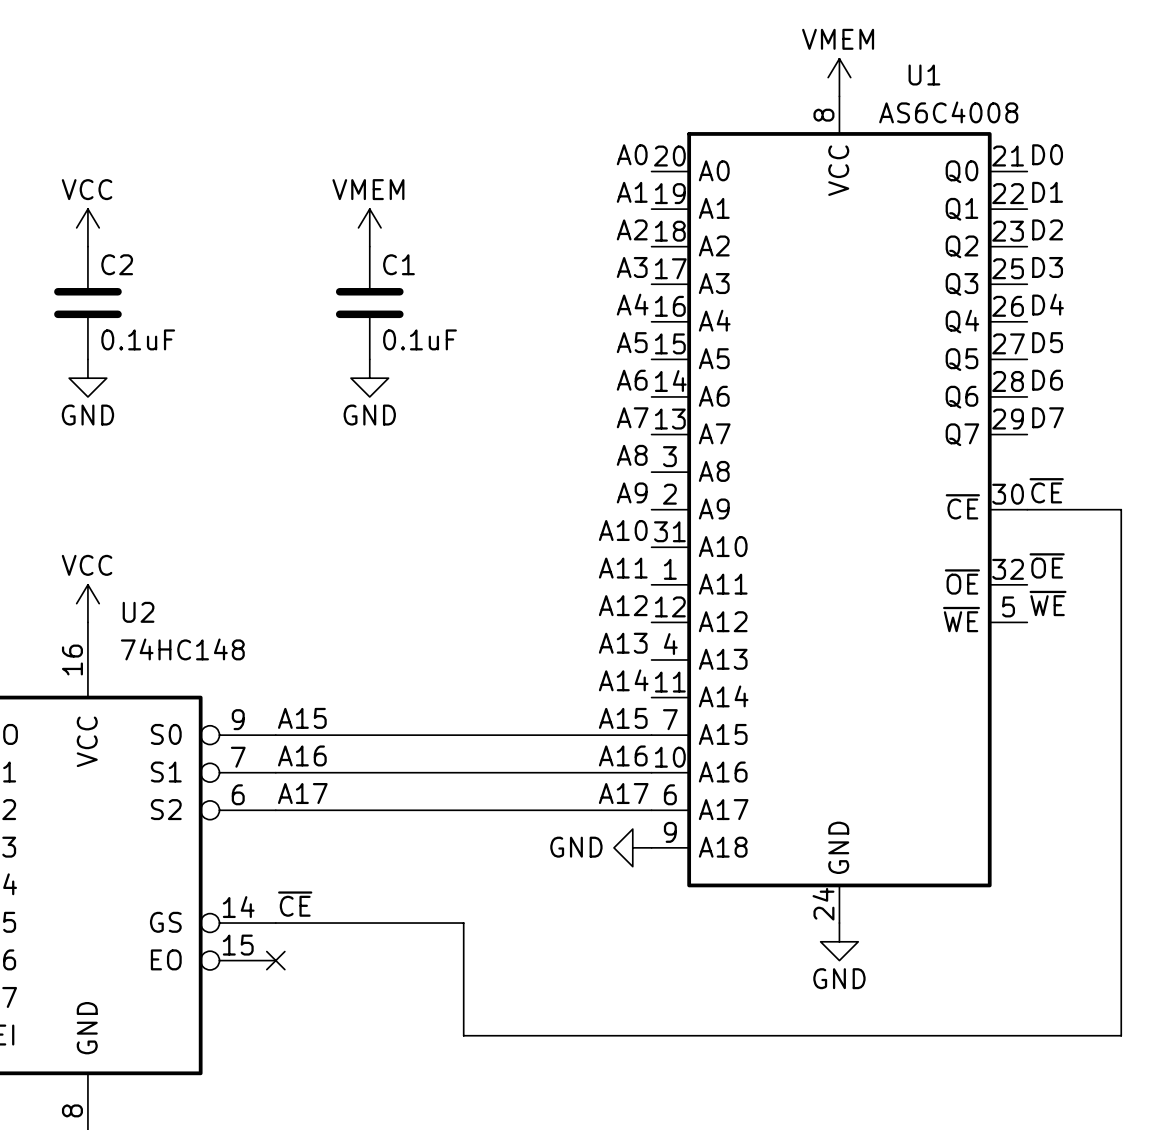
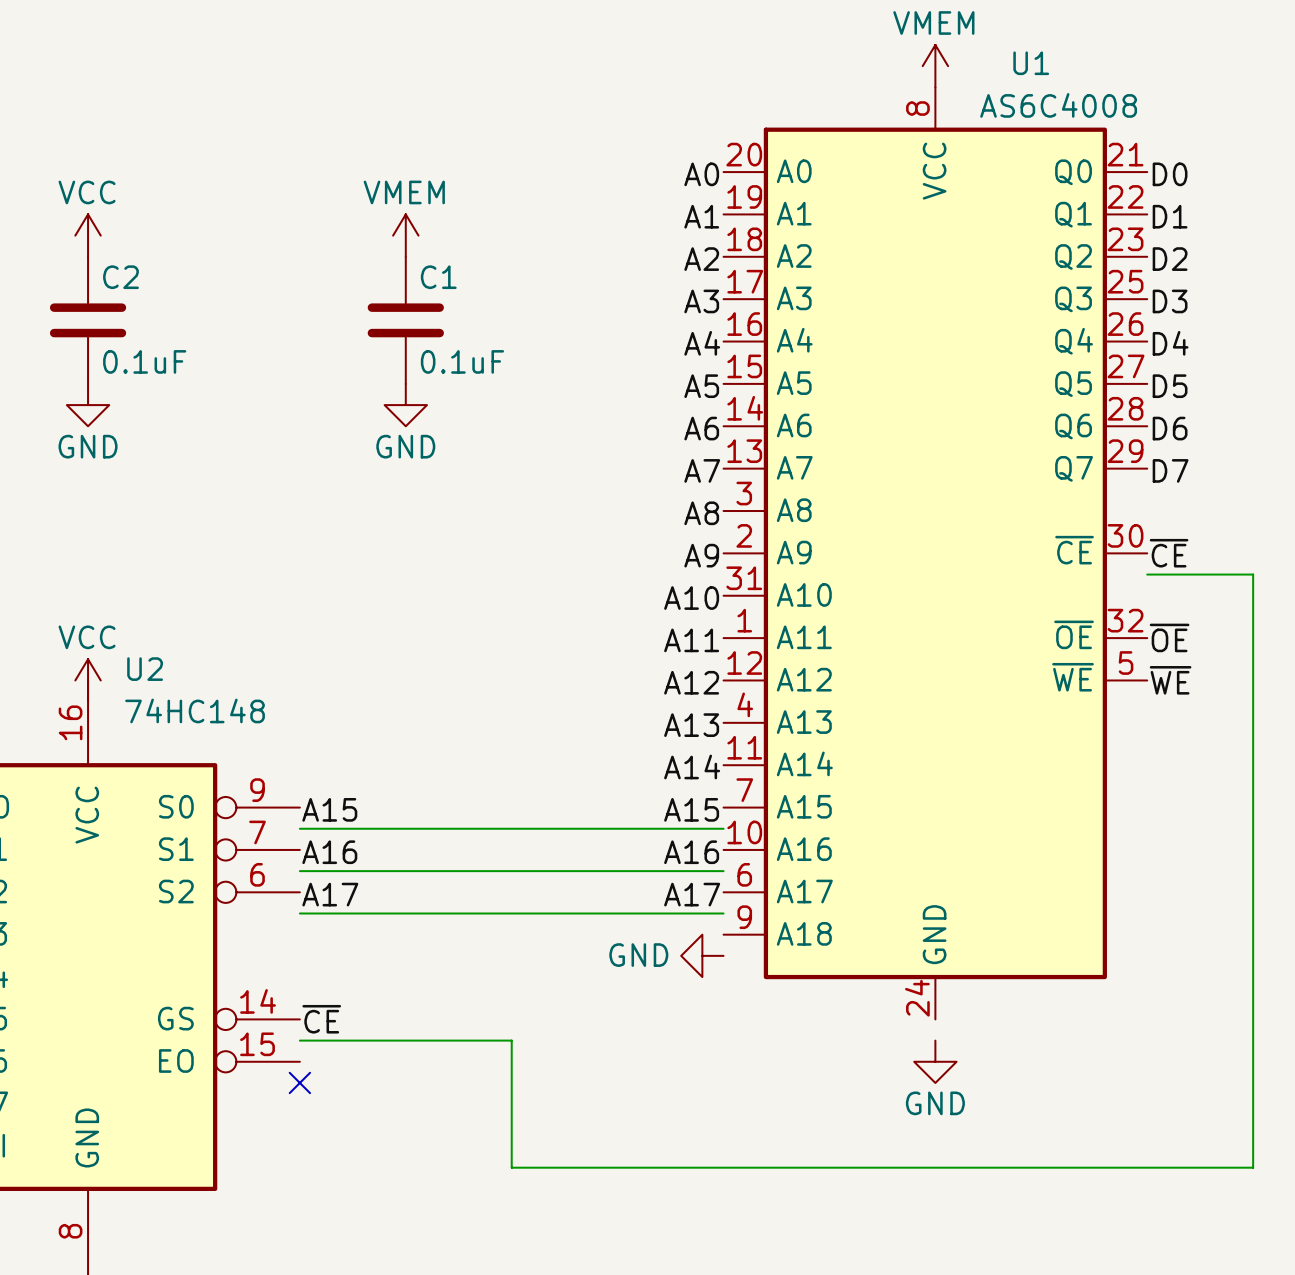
label position: A0 (632, 154) -> A0 (701, 174)
label position: D0 (1047, 154) -> D0 (1170, 174)
label position: A1 (632, 192) -> A1 (701, 216)
label position: D1 (1047, 192) -> D1 (1170, 216)
label position: A2 (632, 229) -> A2 (701, 259)
label position: D2 (1047, 229) -> D2 (1170, 259)
label position: A3 (632, 267) -> A3 (701, 301)
label position: D3 (1047, 267) -> D3 (1170, 301)
label position: A4 (632, 304) -> A4 (702, 343)
label position: D4 (1048, 304) -> D4 (1170, 343)
label position: A5 (632, 342) -> A5 (701, 386)
label position: D5 (1047, 342) -> D5 (1170, 386)
label position: A6 (632, 380) -> A6 (701, 428)
label position: D6 (1047, 380) -> D6 (1170, 428)
label position: A7 (632, 417) -> A7 (702, 470)
label position: D7 (1048, 417) -> D7 (1170, 470)
label position: A8 (632, 455) -> A8 (701, 513)
label position: ~{CE} (1046, 490) -> ~{CE} (1169, 553)
label position: A9 (632, 492) -> A9 (701, 555)
wire: (1027, 509) (1121, 509) (1121, 528) -> (1147, 574) (1253, 574)
label position: A10 (623, 530) -> A10 (691, 598)
label position: ~{OE} (1047, 565) -> ~{OE} (1169, 637)
label position: A11 (623, 568) -> A11 (691, 640)
power symbol position: VCC (87, 603) -> VCC (88, 680)
label position: ~{WE} (1048, 603) -> ~{WE} (1170, 680)
label position: A12 (623, 605) -> A12 (691, 682)
label position: A13 (623, 643) -> A13 (691, 725)
label position: A14 (623, 680) -> A14 (692, 766)
label position: A15 (302, 718) -> A15 (329, 809)
label position: A15 (623, 718) -> A15 (691, 809)
wire: (275, 735) (651, 735) -> (299, 828) (723, 828)
label position: A16 (302, 755) -> A16 (329, 852)
label position: A16 (623, 755) -> A16 (691, 852)
wire: (275, 772) (651, 772) -> (299, 871) (723, 871)
label position: A17 (302, 793) -> A17 (330, 894)
label position: A17 (623, 793) -> A17 (692, 894)
wire: (275, 810) (651, 810) -> (299, 913) (723, 913)
power symbol position: GND (632, 847) -> GND (702, 955)
label position: ~{CE} (295, 904) -> ~{CE} (321, 1019)
wire: (275, 923) (463, 923) (463, 941) -> (299, 1040) (511, 1040)
power symbol position: GND (839, 941) -> GND (935, 1061)
no-connect mark position: (275, 960) -> (299, 1082)
wire: (463, 1035) (1121, 1035) -> (511, 1146) (511, 1167) (1253, 1167) (1253, 1146)

